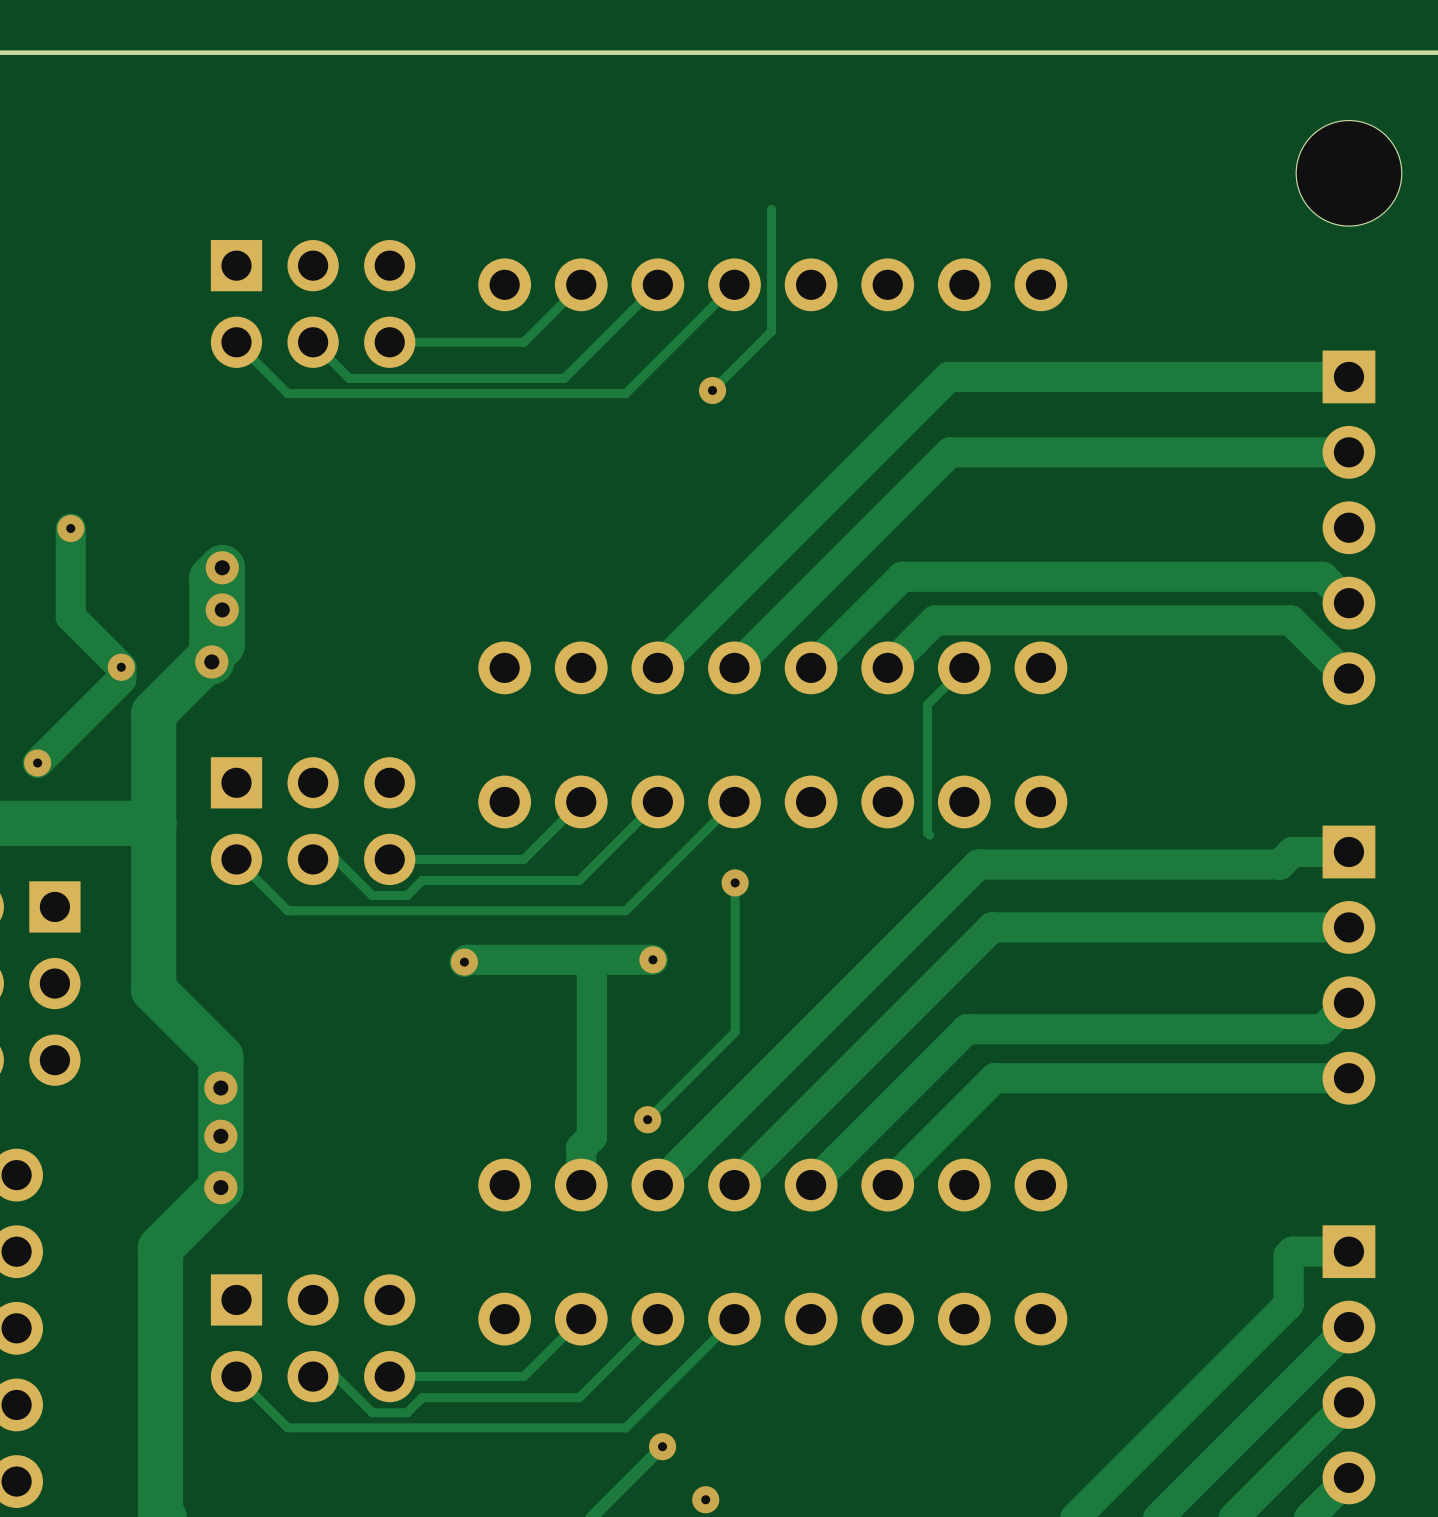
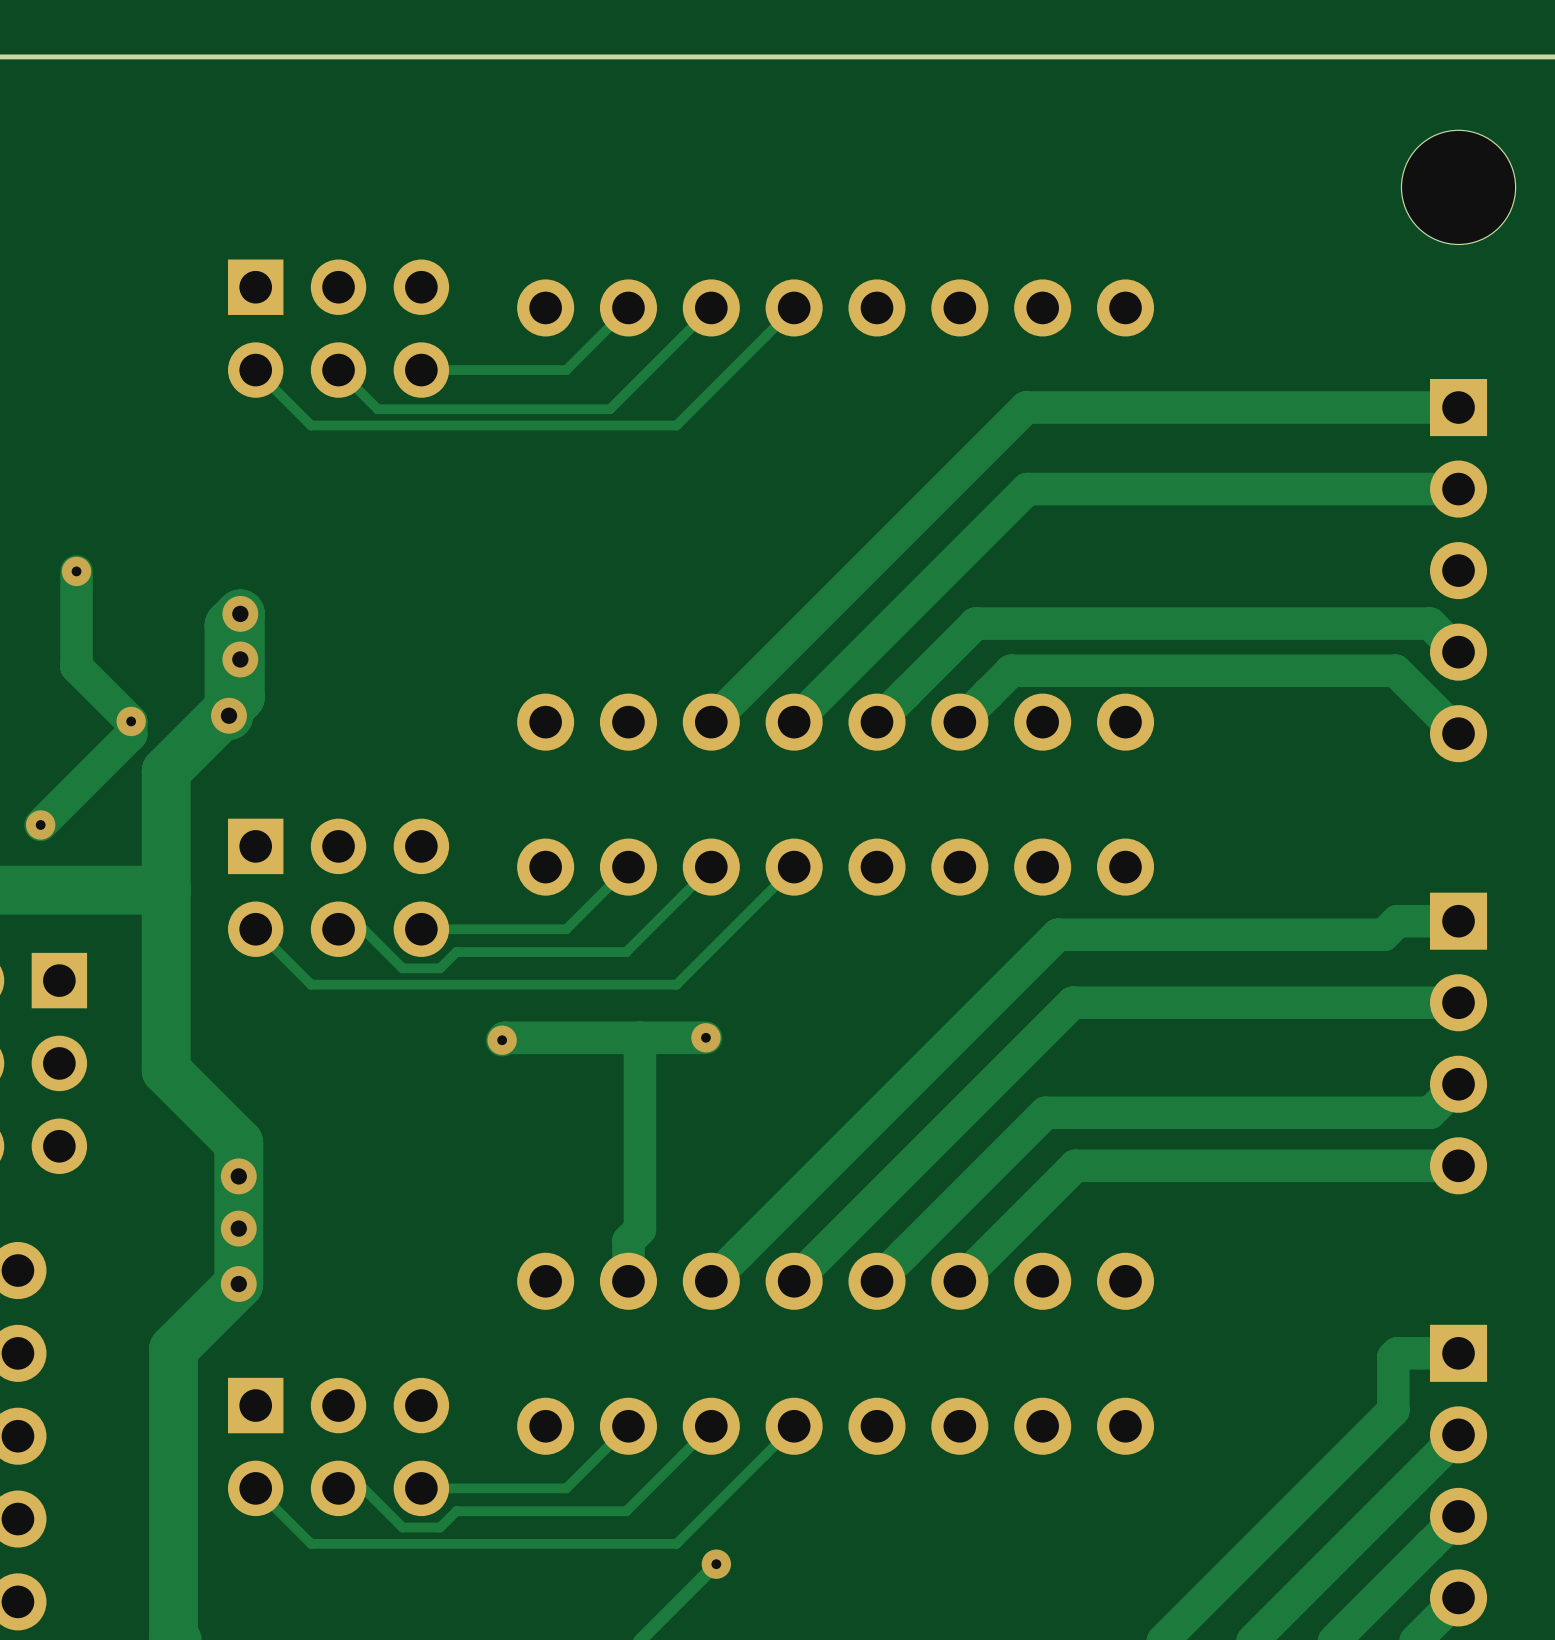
track: (771, 209) (771, 331) (712, 390) -> none
via: (712, 390) -> none
track: (964, 667) (927, 704) (927, 832) (929, 835) -> none
track: (735, 882) (735, 1032) (647, 1119) -> none
via: (735, 882) -> none
via: (647, 1119) -> none
via: (705, 1499) -> none

